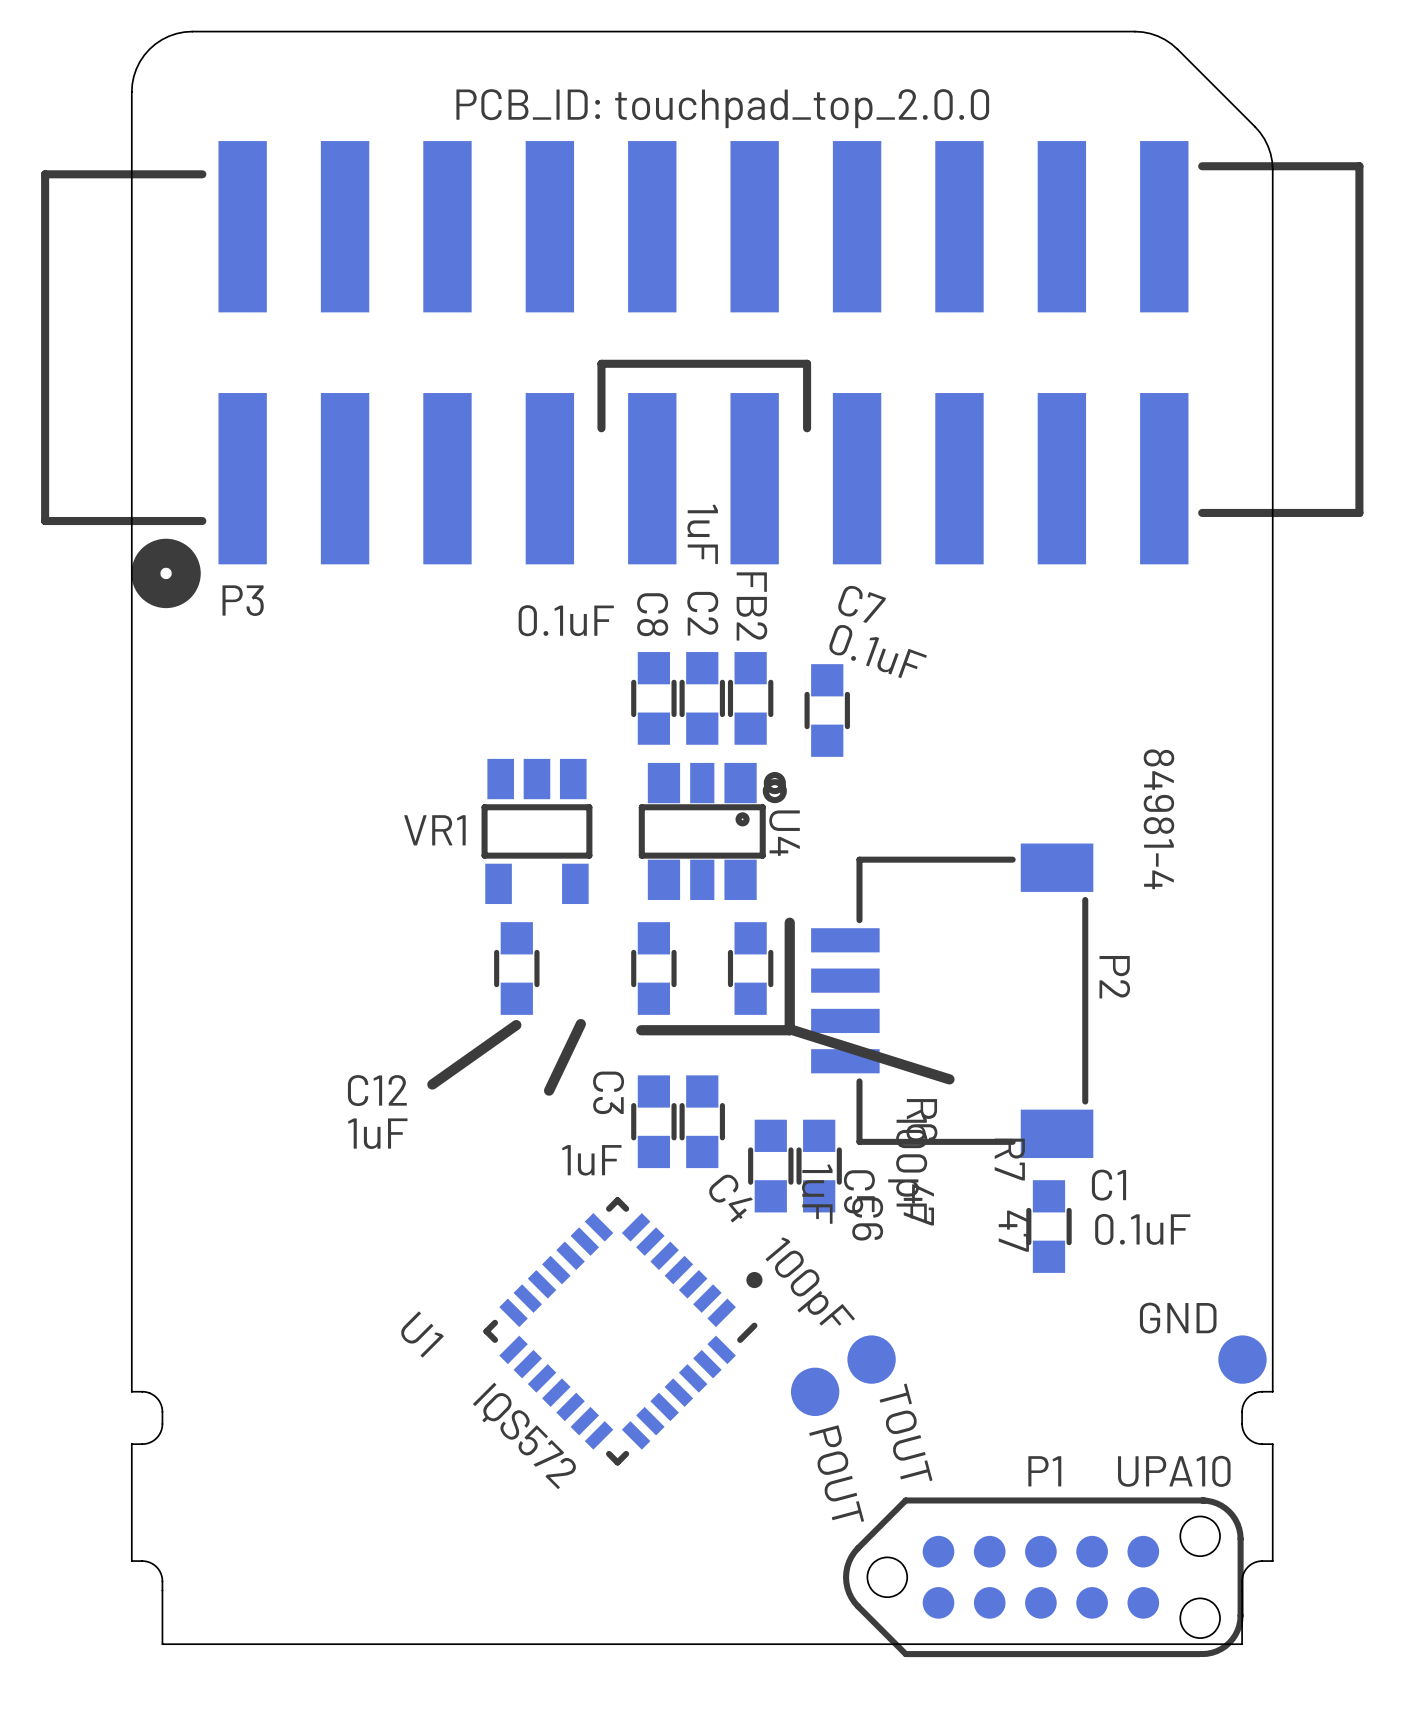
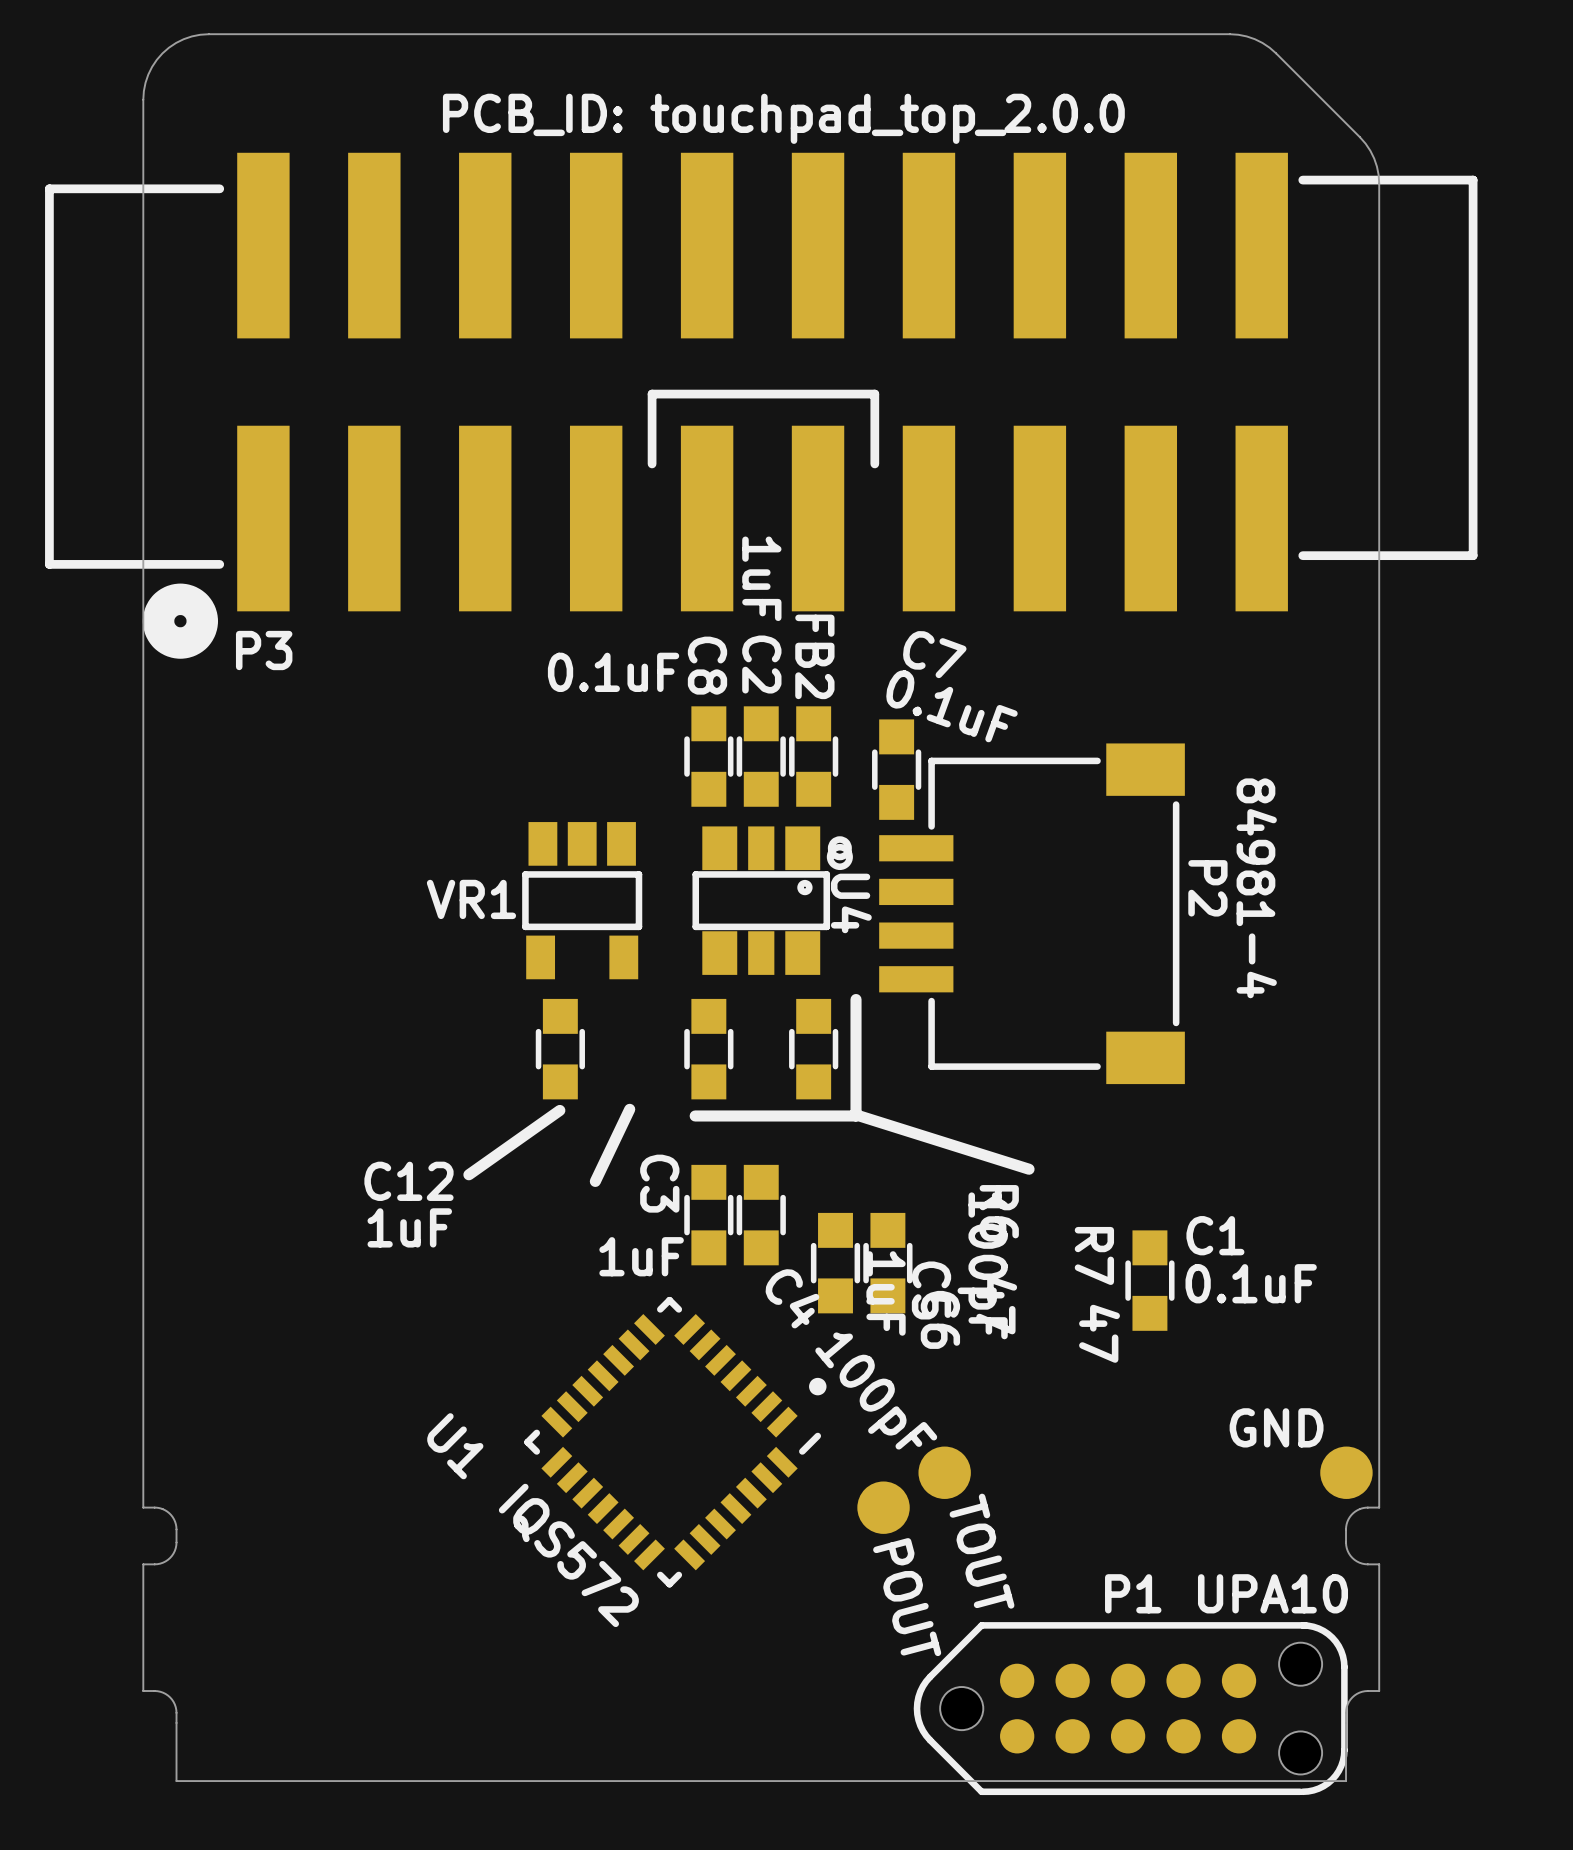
P2 position: (952, 1000) -> (1032, 913)
C1 position: (1048, 1226) -> (1149, 1280)

